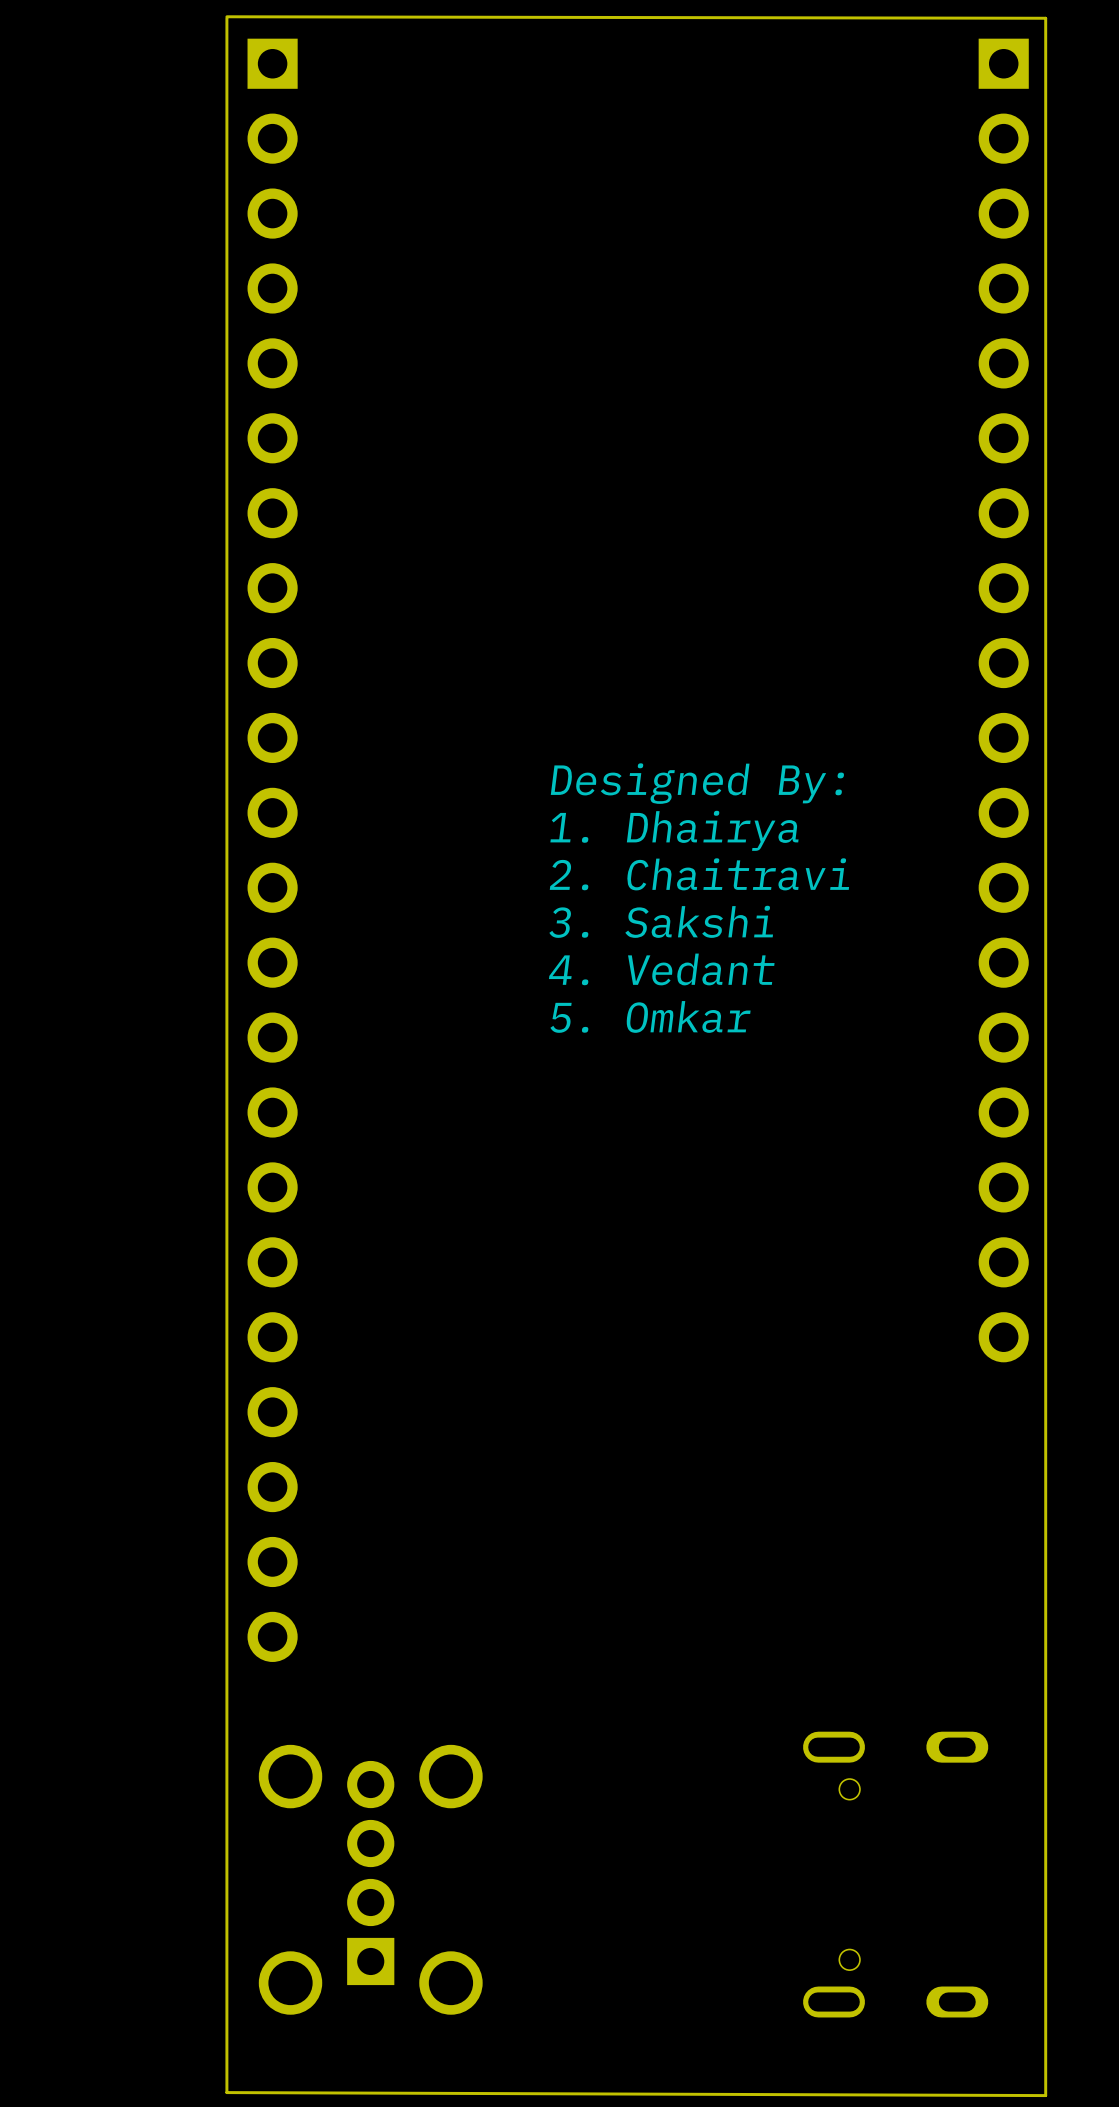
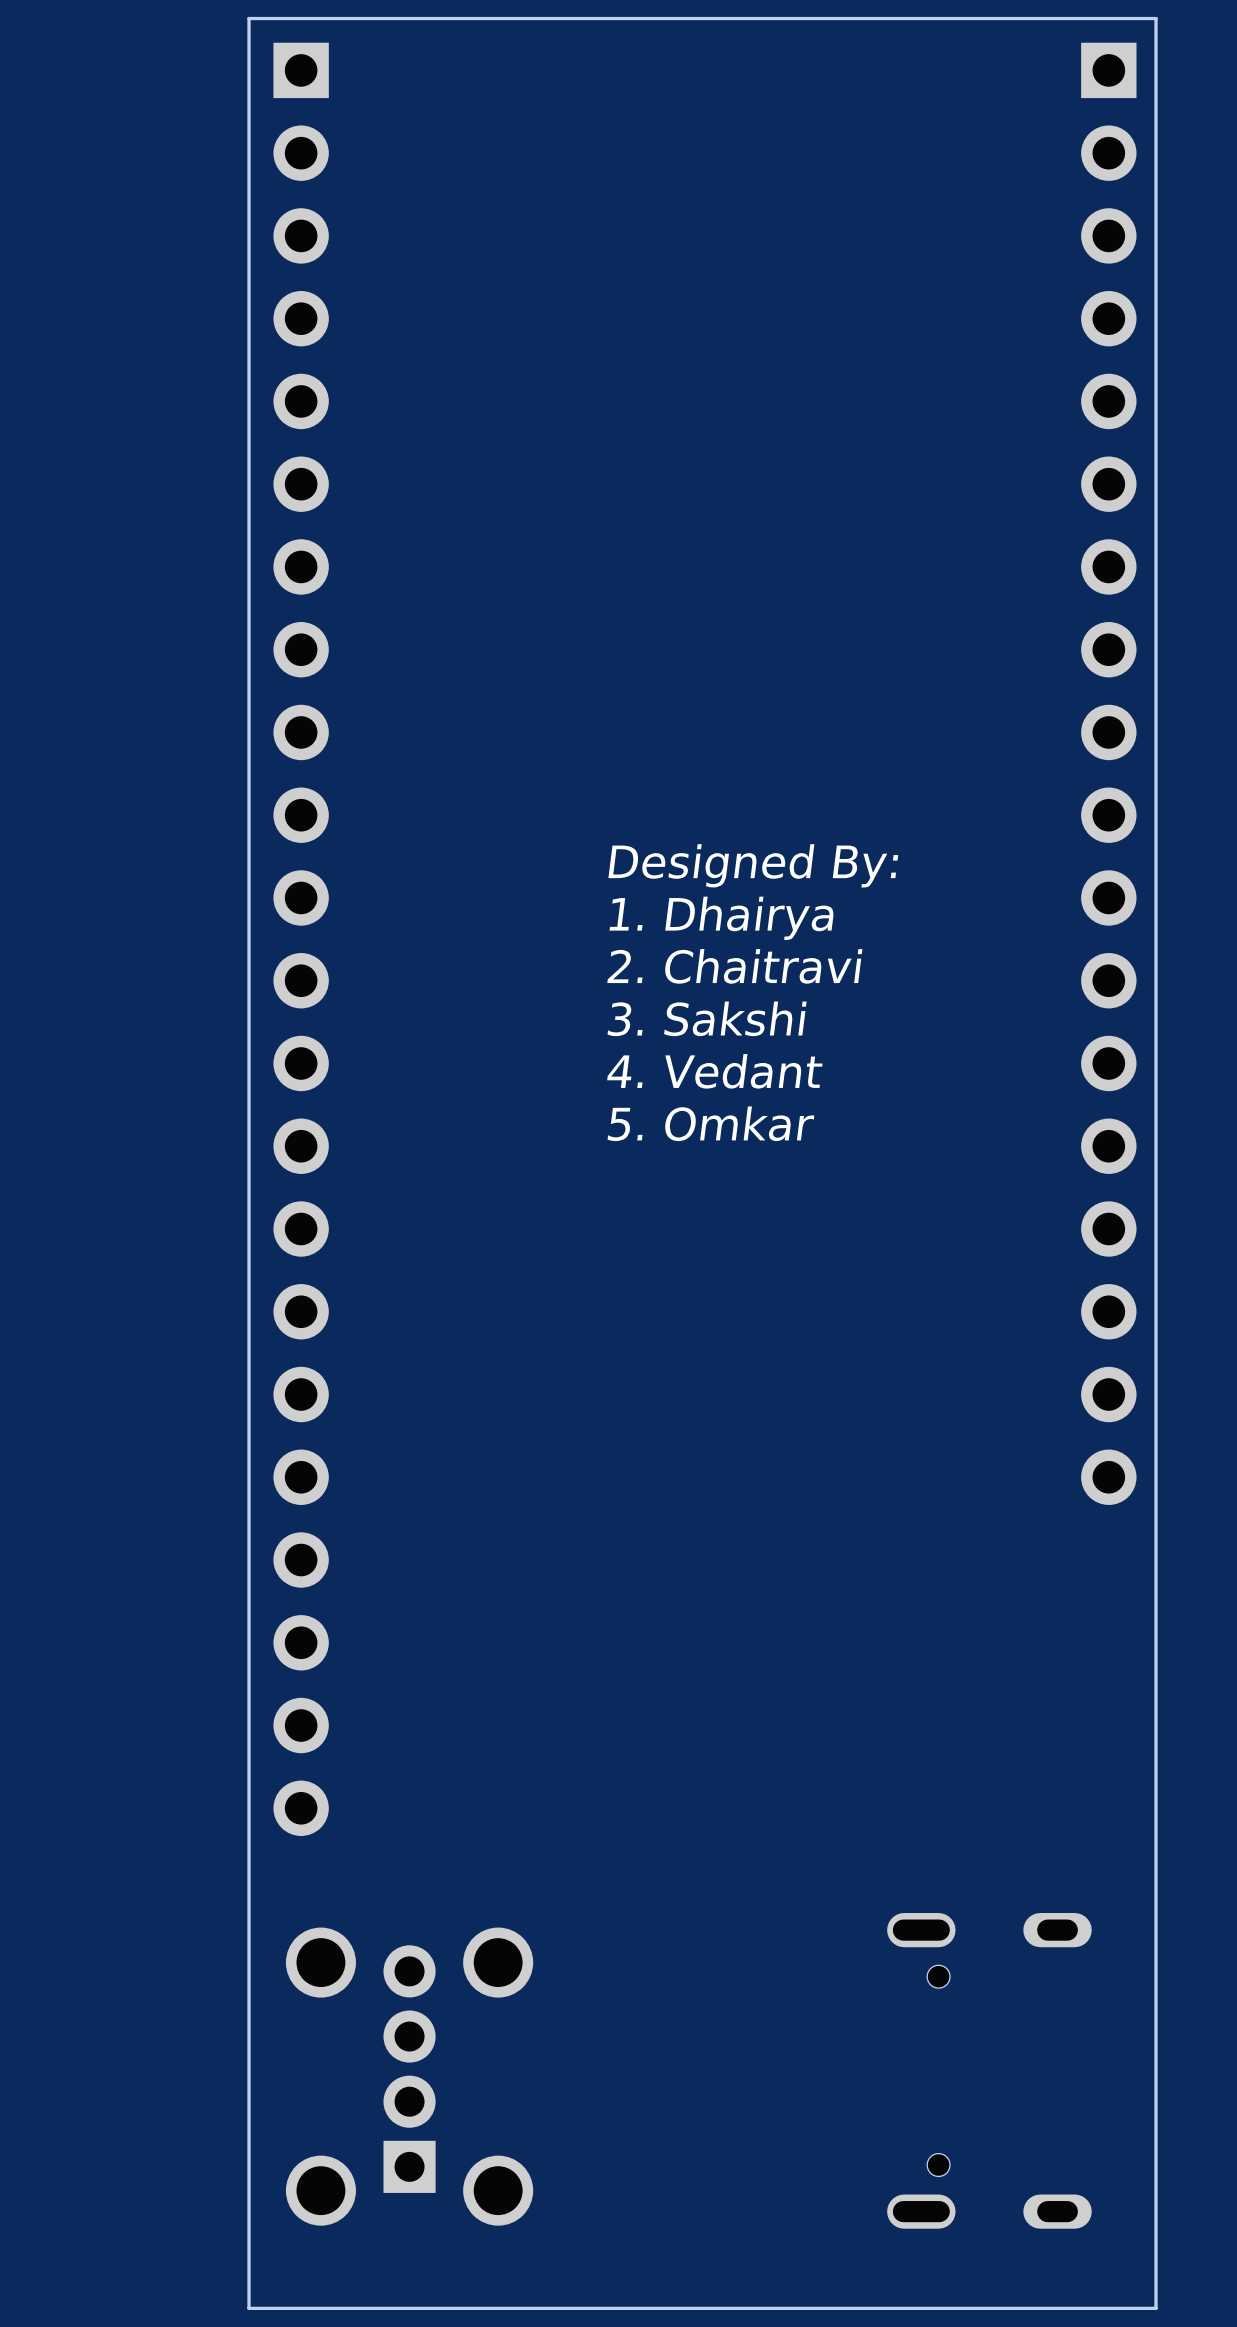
board edge: (226, 16) (1045, 18) (1045, 2095) (226, 2092) (226, 18) -> none
board edge: none -> (1156, 18) (249, 18) (249, 2308) (1156, 2308) (1156, 18)

